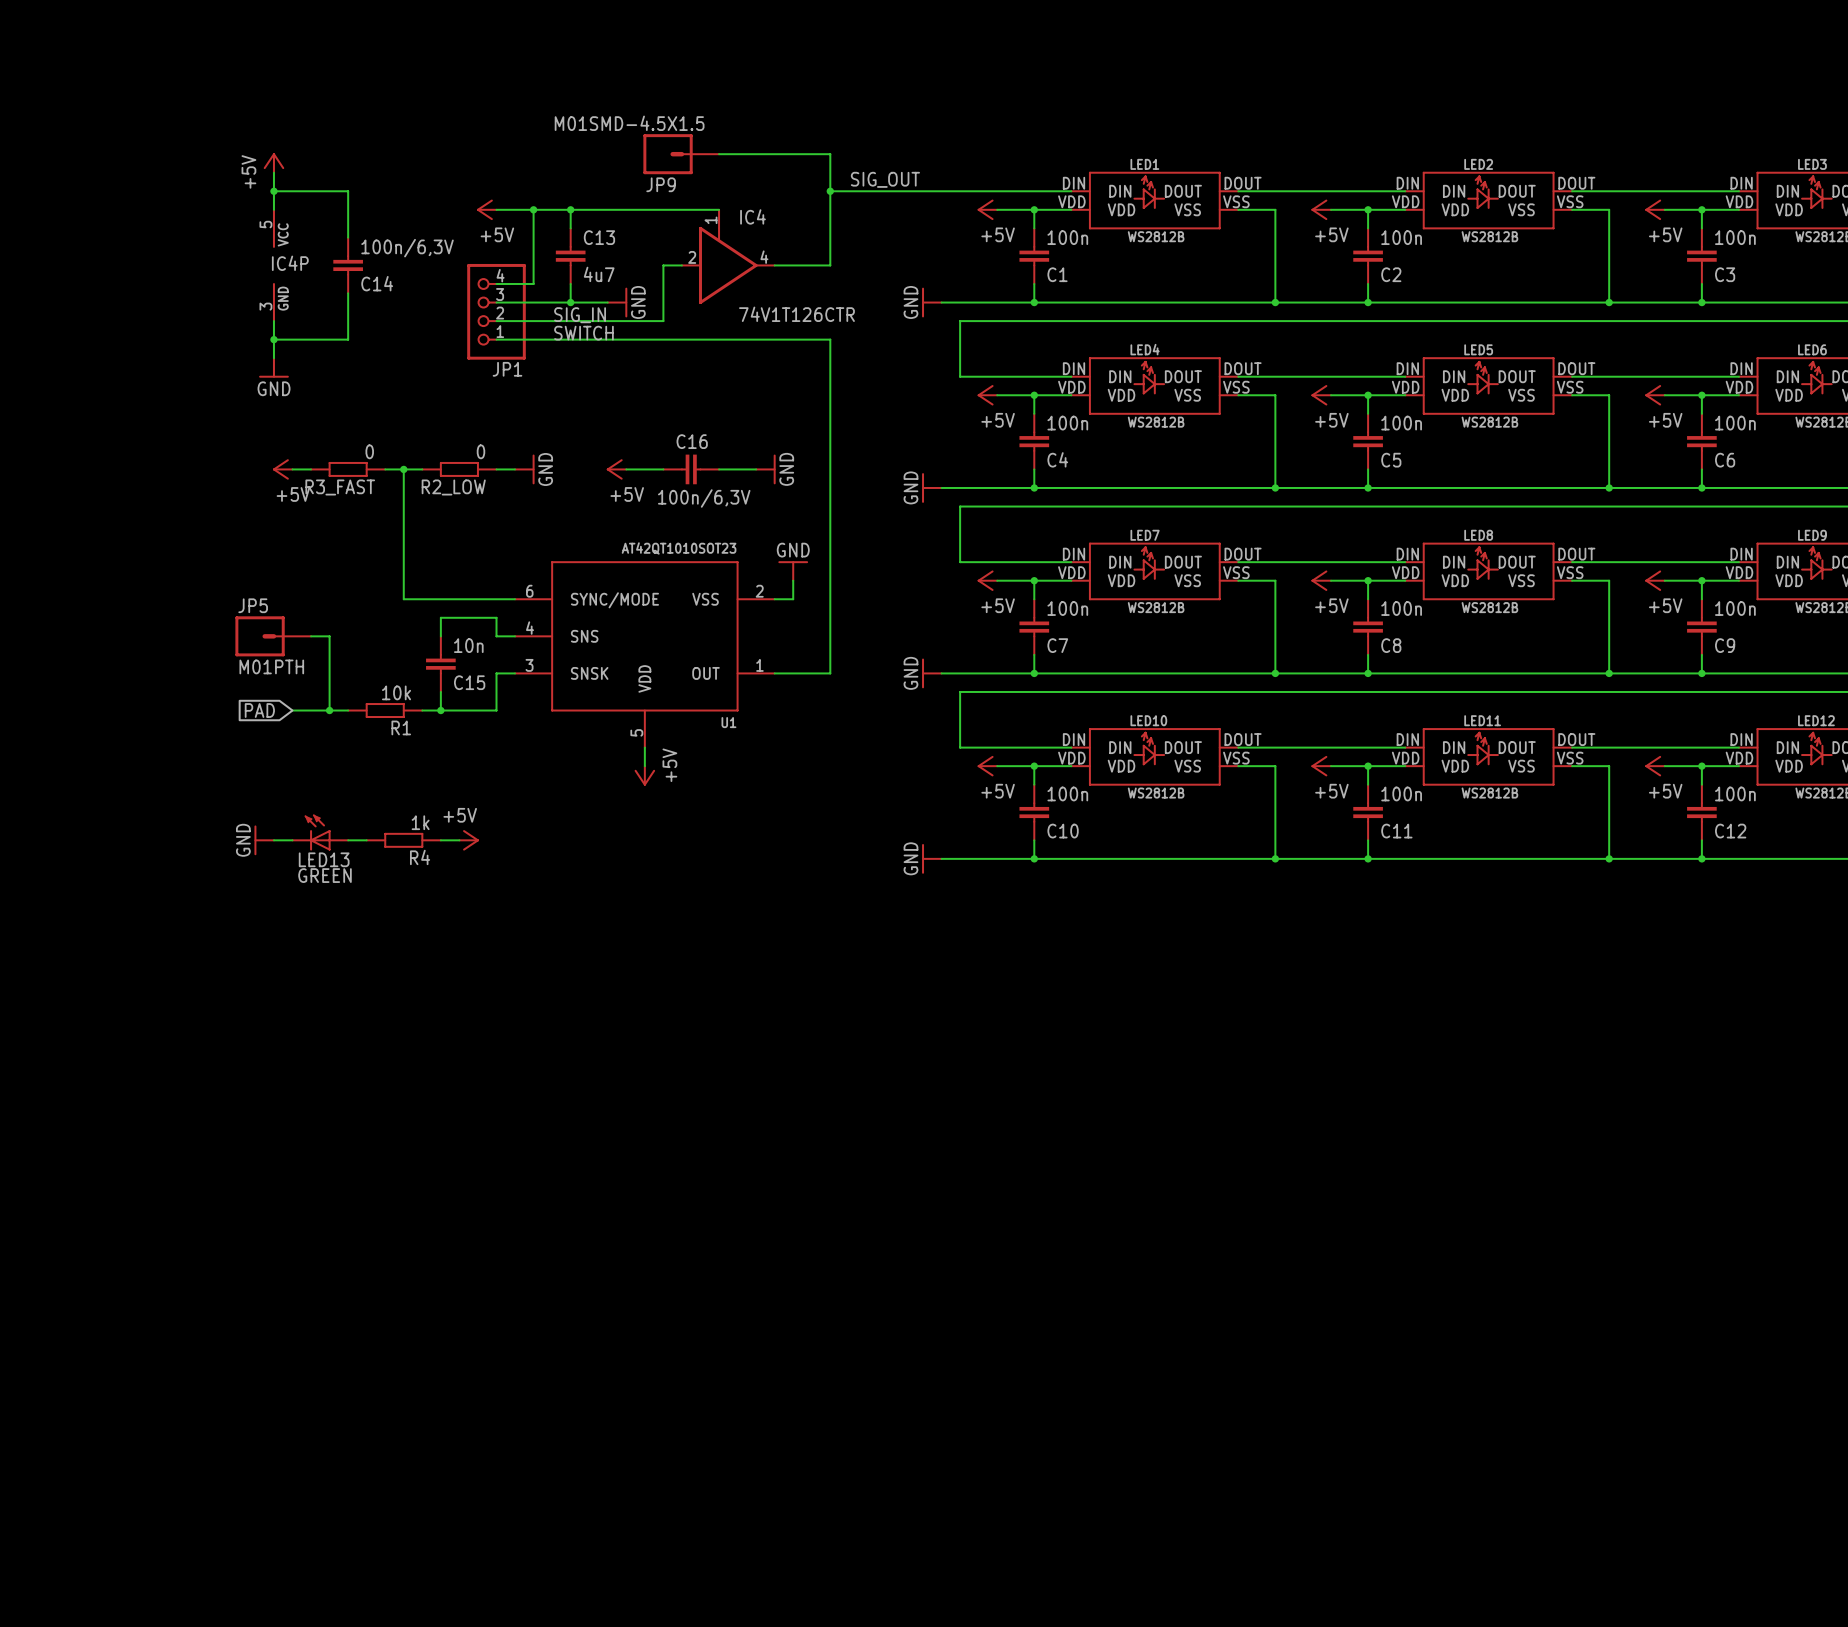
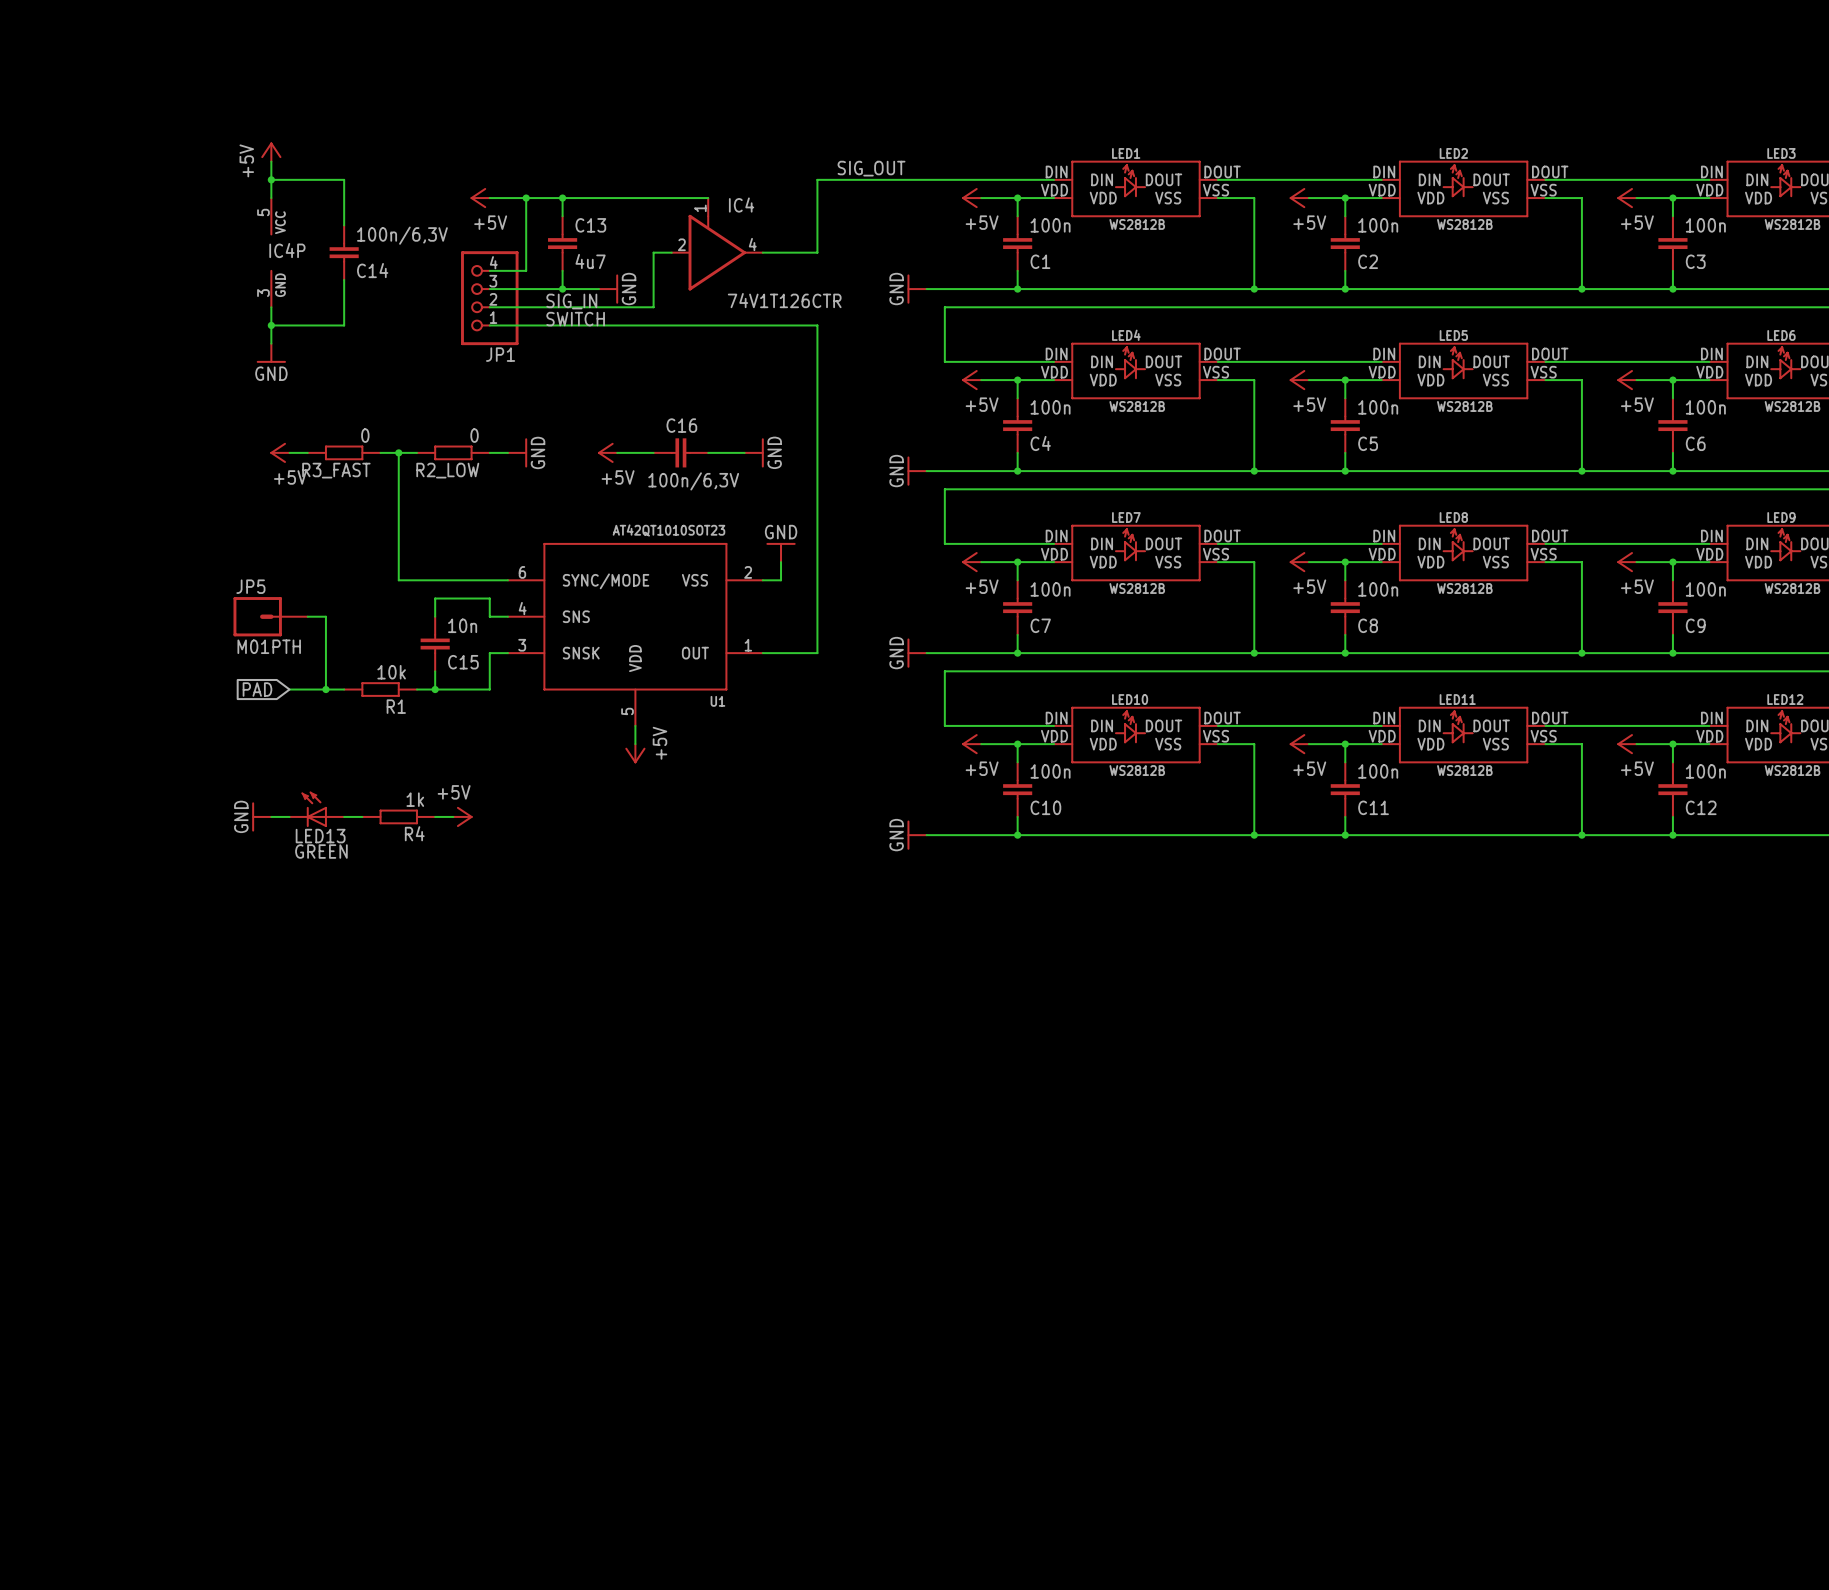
JP9: M01SMD-4.5X1.5 (681, 154) -> none
wire: (719, 154) (830, 154) (830, 191) -> none
junction: (830, 191) -> none

